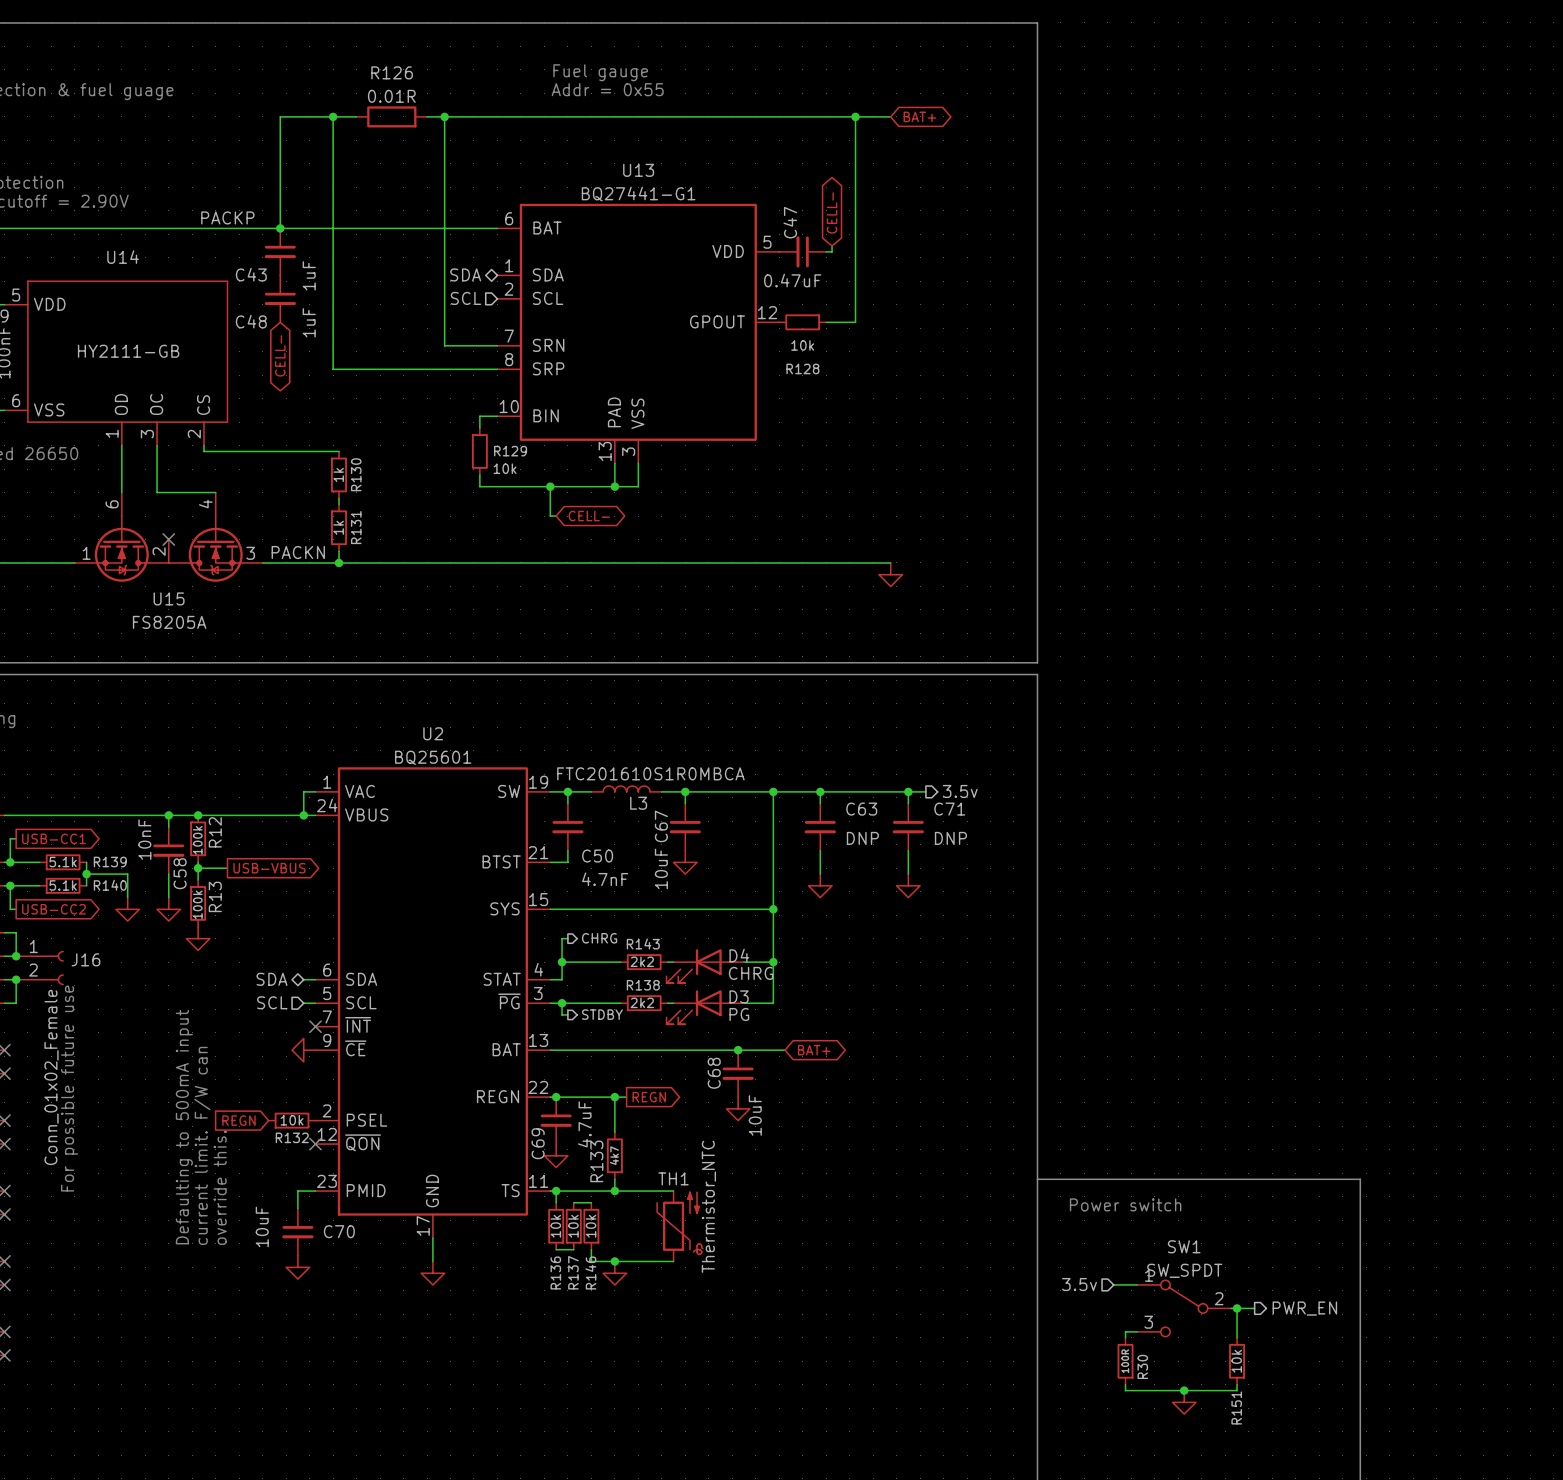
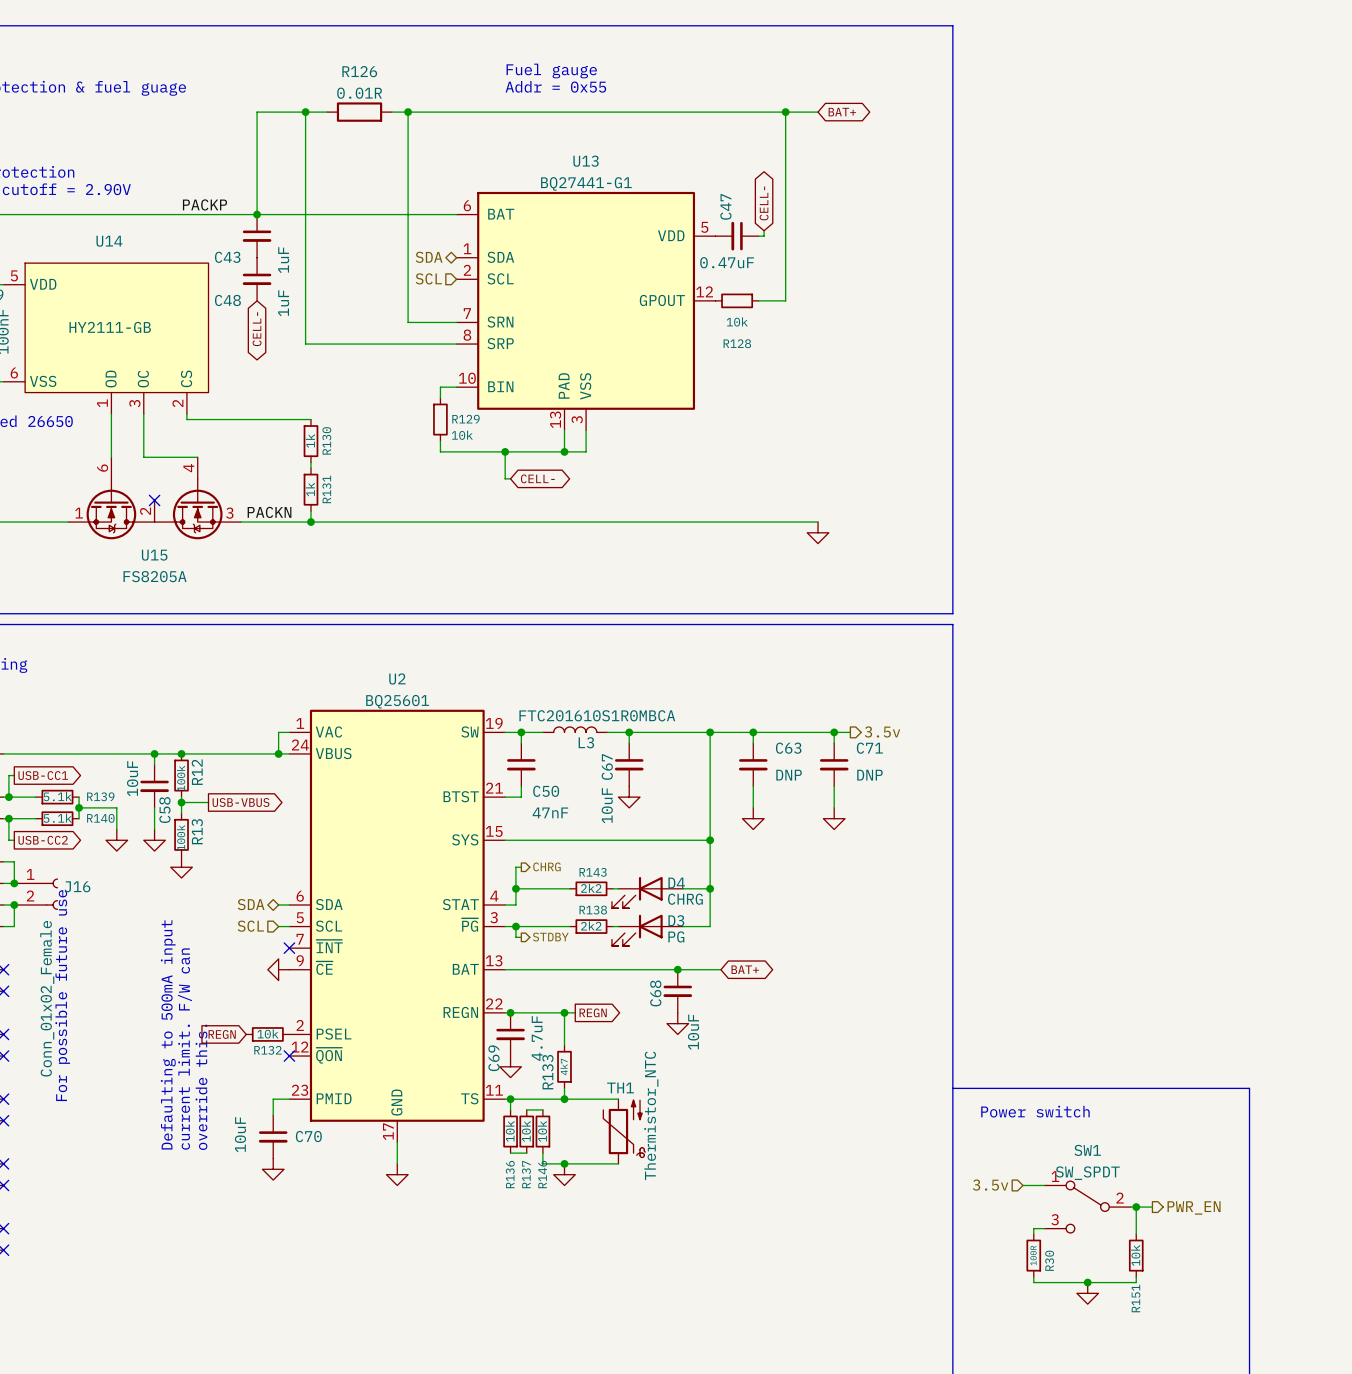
C58 value: 10nF (144, 839) -> 10uF (132, 778)
C50 value: 4.7nF (605, 879) -> 47nF (550, 812)

